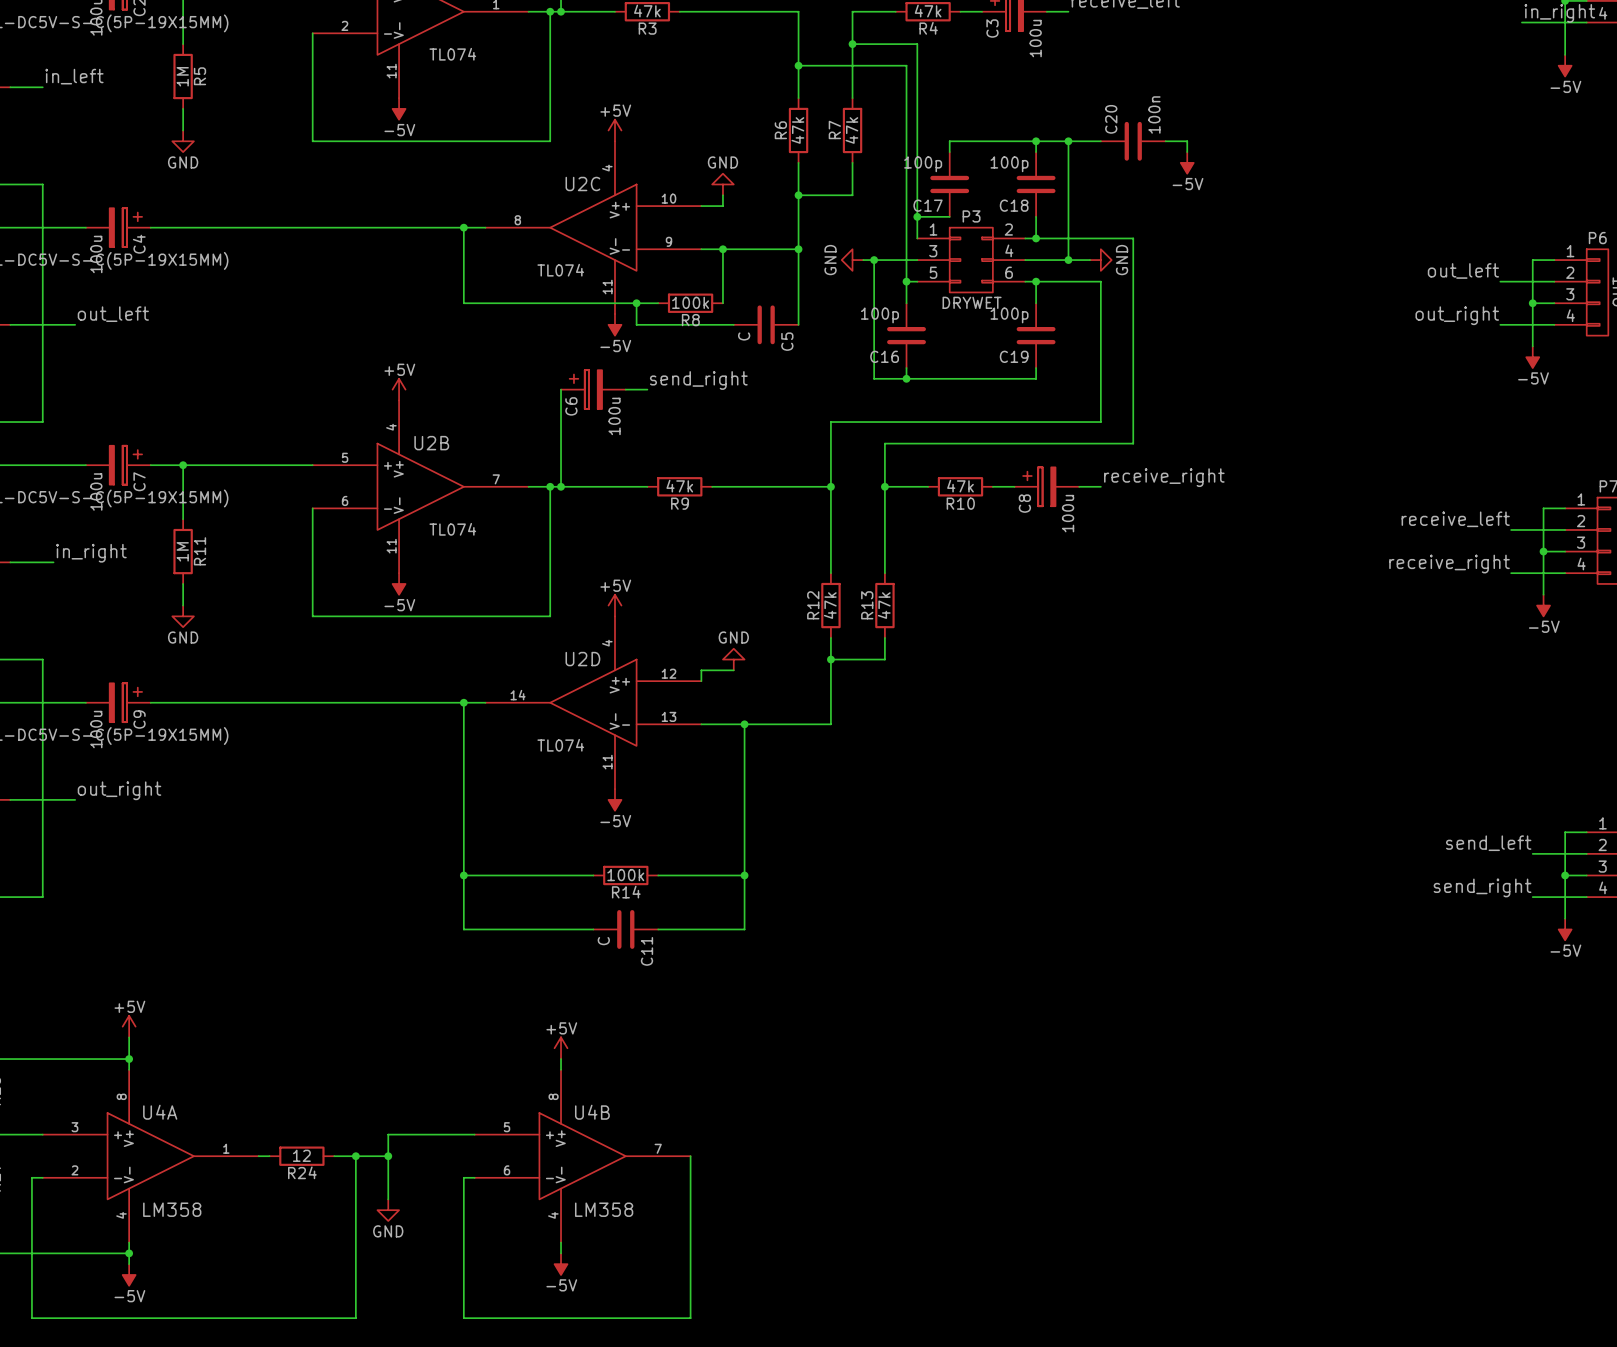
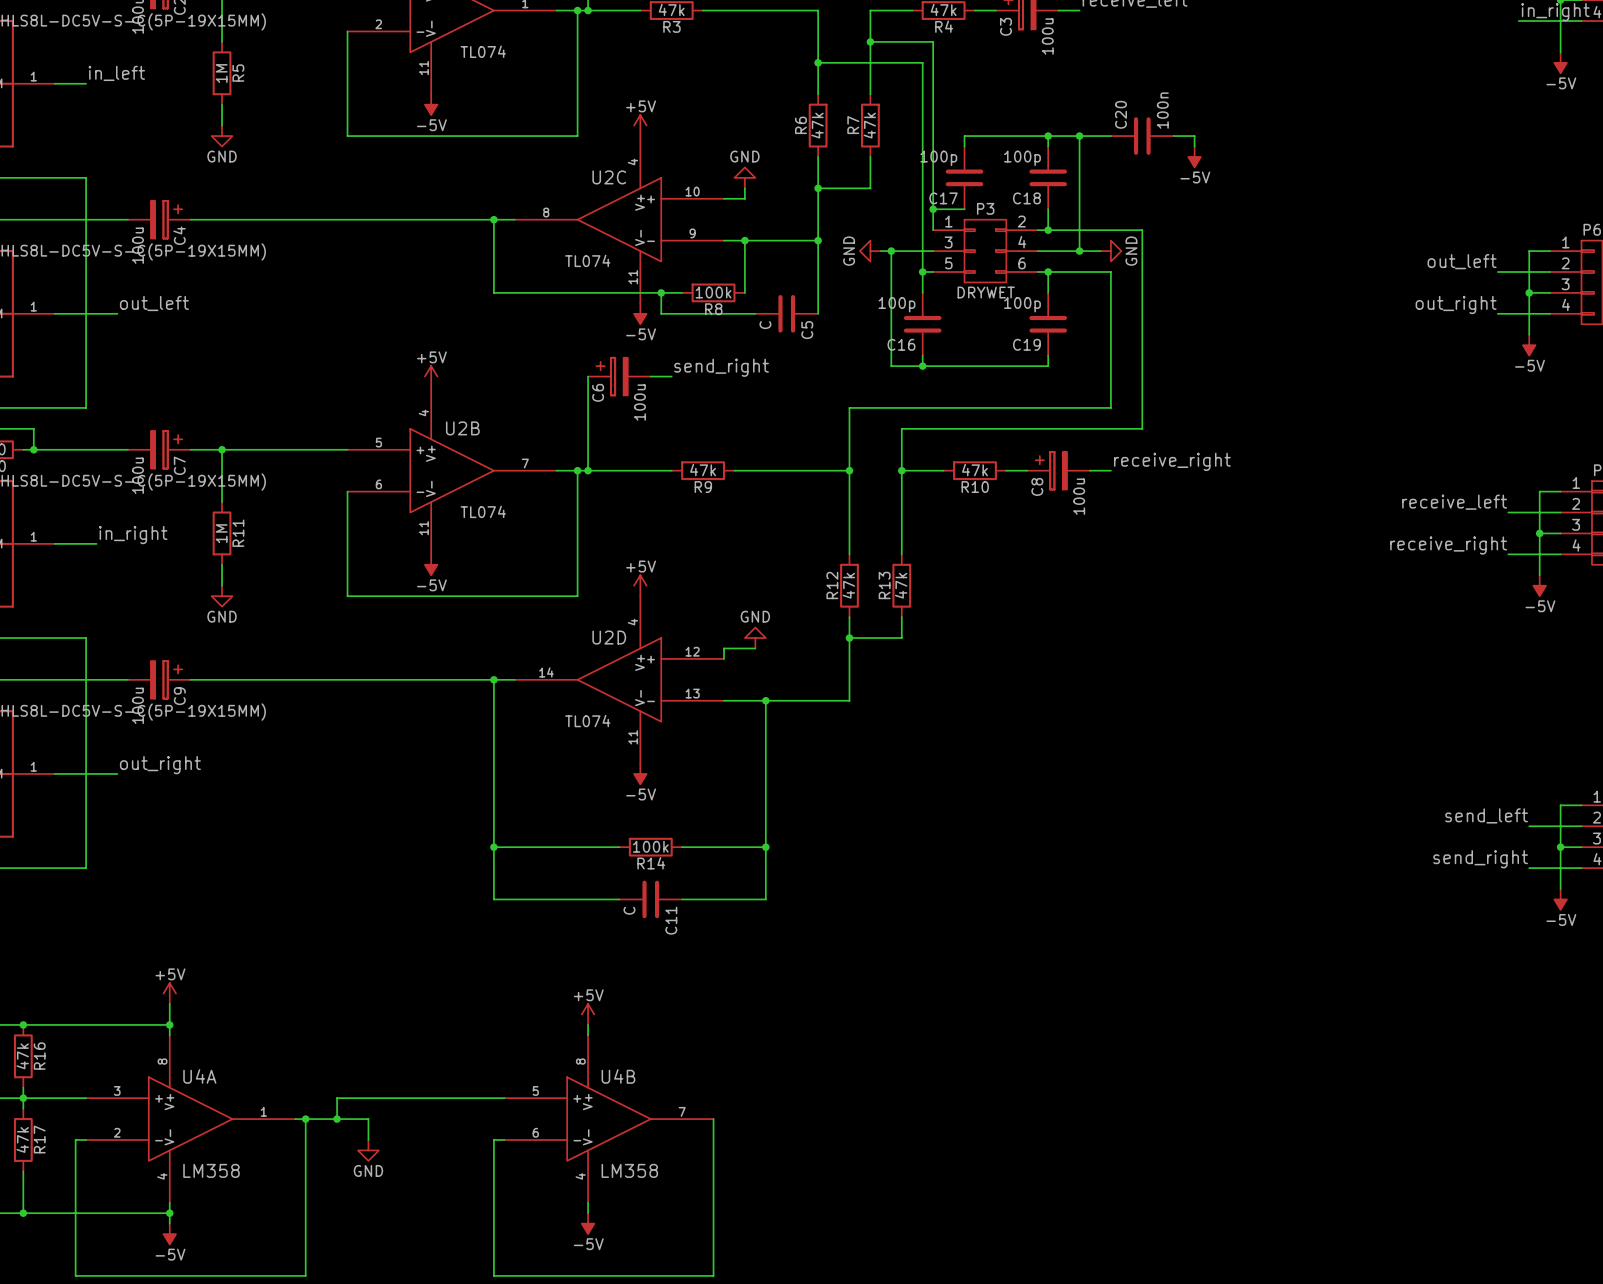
wire: (388, 1134) (388, 1199) -> (420, 1098) (337, 1098) (337, 1119)
junction: none -> (305, 1119)
R24: 12 (301, 1156) -> none
junction: none -> (337, 1119)
wire: (334, 1156) (388, 1156) -> none
wire: (355, 1156) (355, 1318) (269, 1318) -> (368, 1139) (368, 1119) (305, 1119) (305, 1275)
junction: (355, 1156) -> none
junction: (388, 1156) -> none
power symbol position: GND (388, 1210) -> GND (368, 1150)

